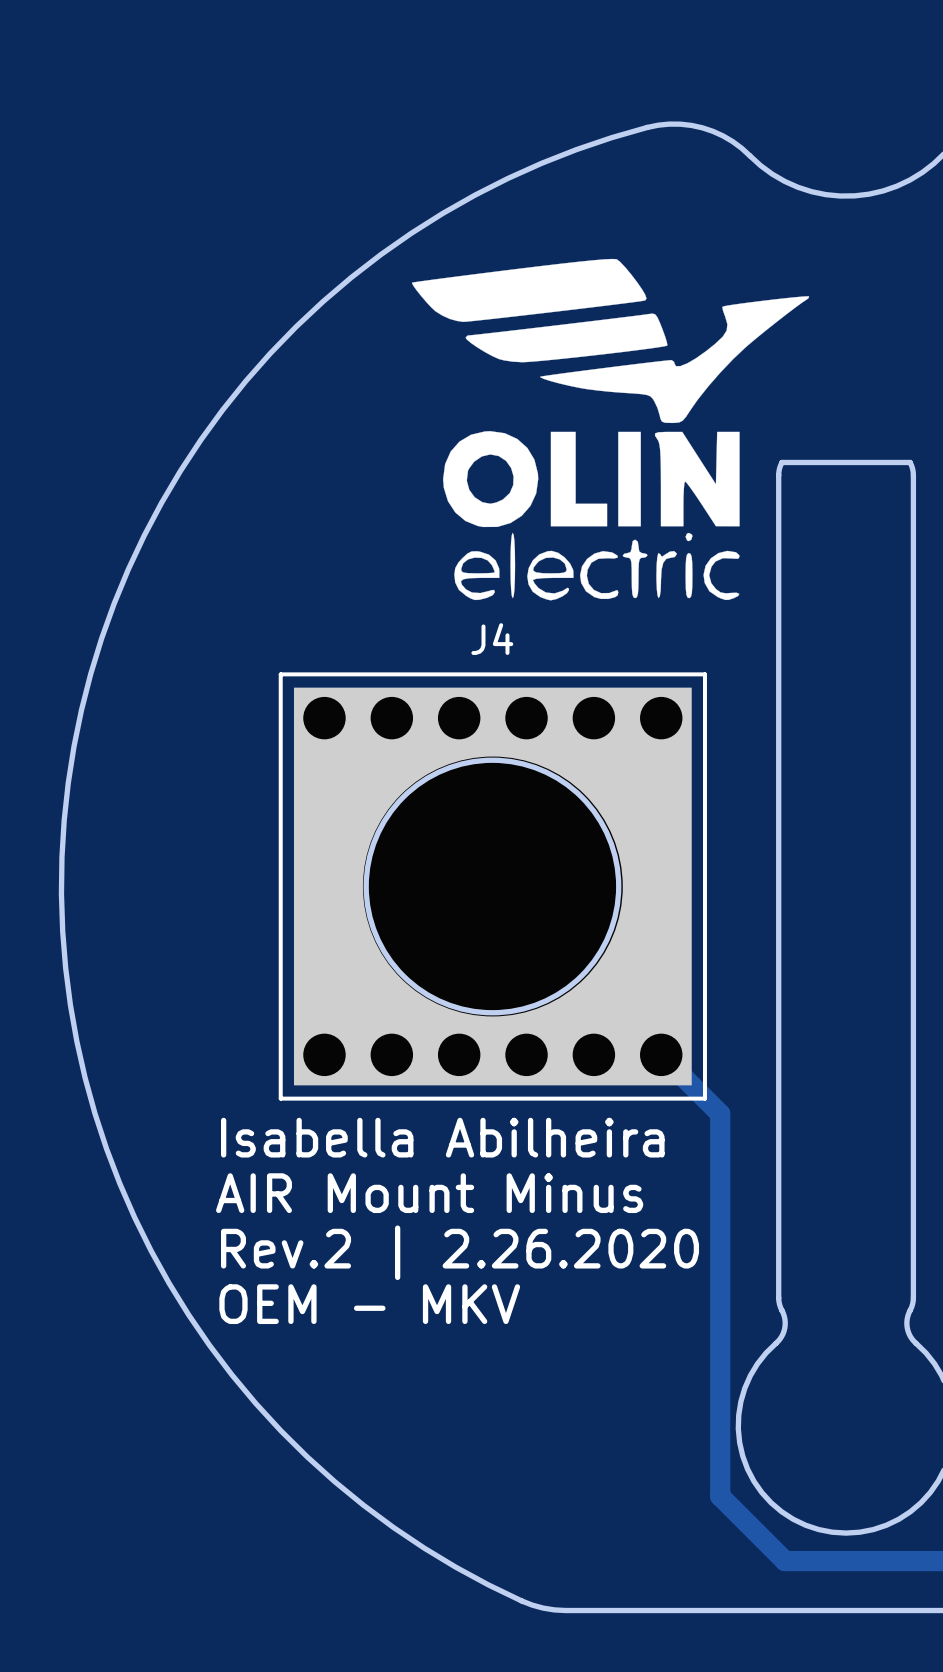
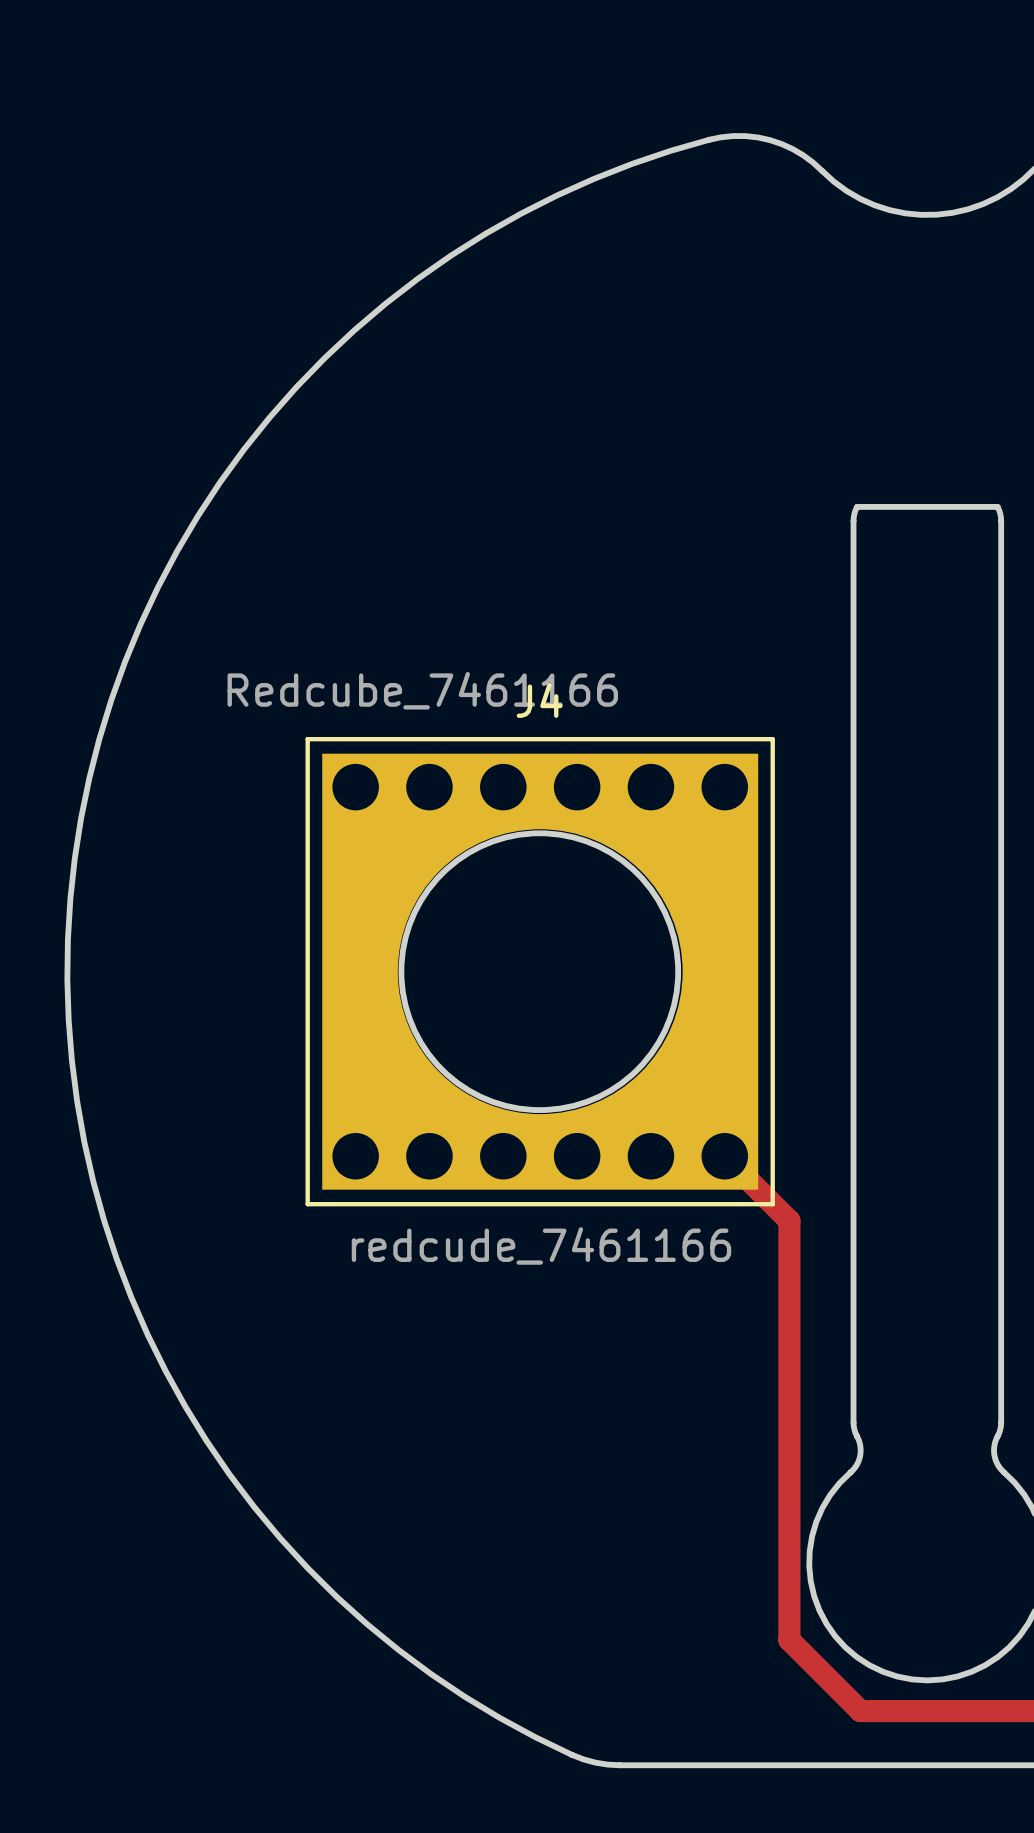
drawing: [411, 258, 810, 601] -> none
J4 text: none -> Redcube_7461166 (422, 690)
J4 value: none -> redcude_7461166 (541, 1245)
text: Isabella Abilheira (442, 1137) -> none
text: AIR Mount Minus (429, 1193) -> none
text: Rev.2 | 2.26.2020 (460, 1252) -> none
text: OEM - MKV (369, 1304) -> none

